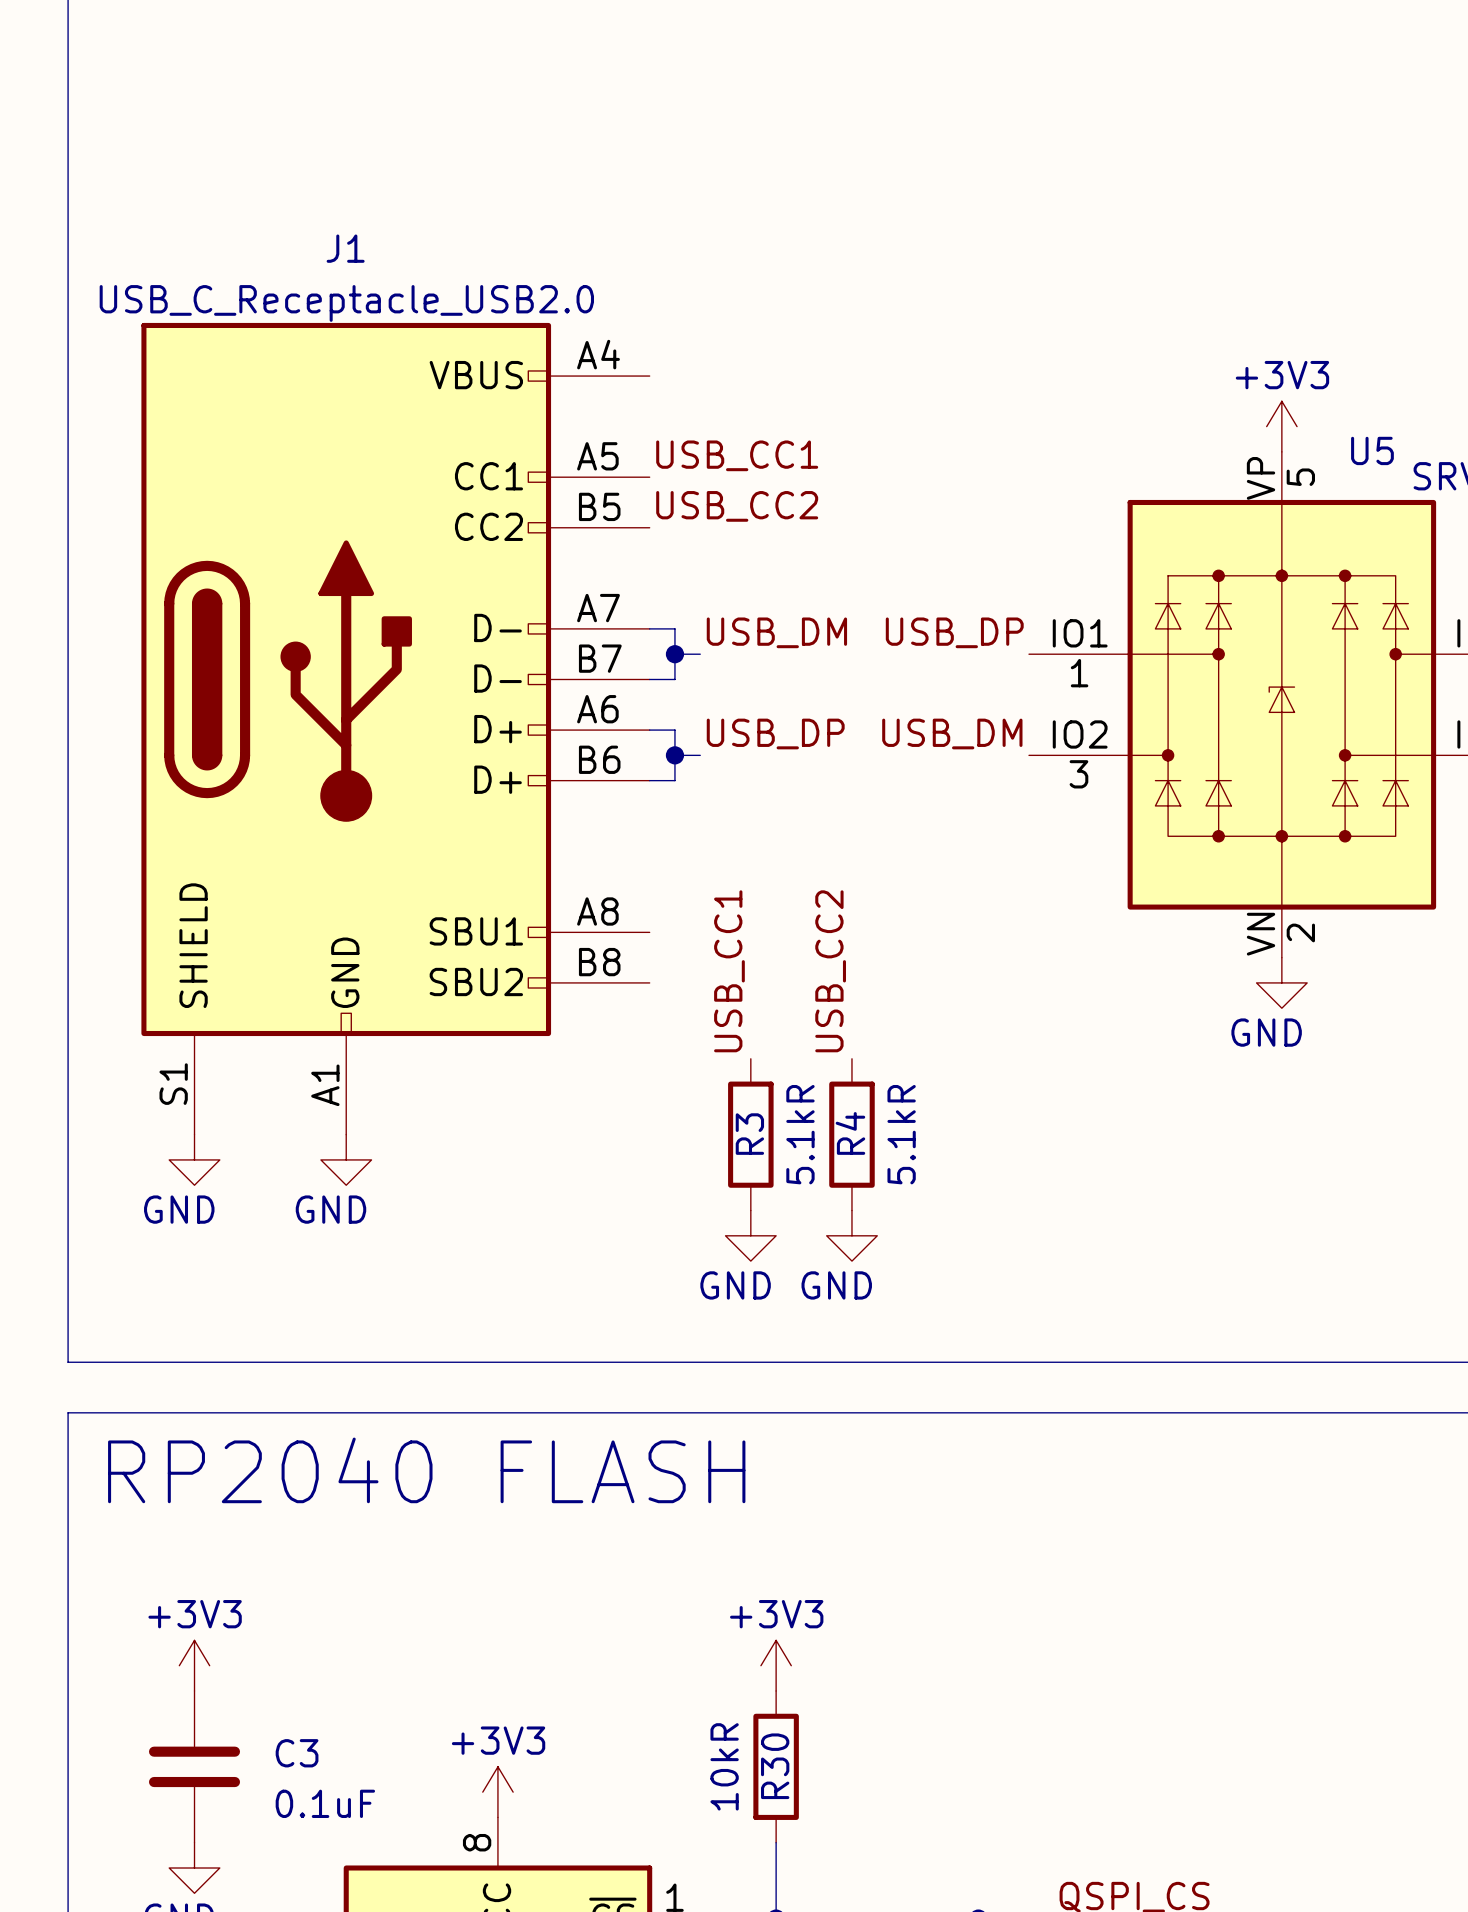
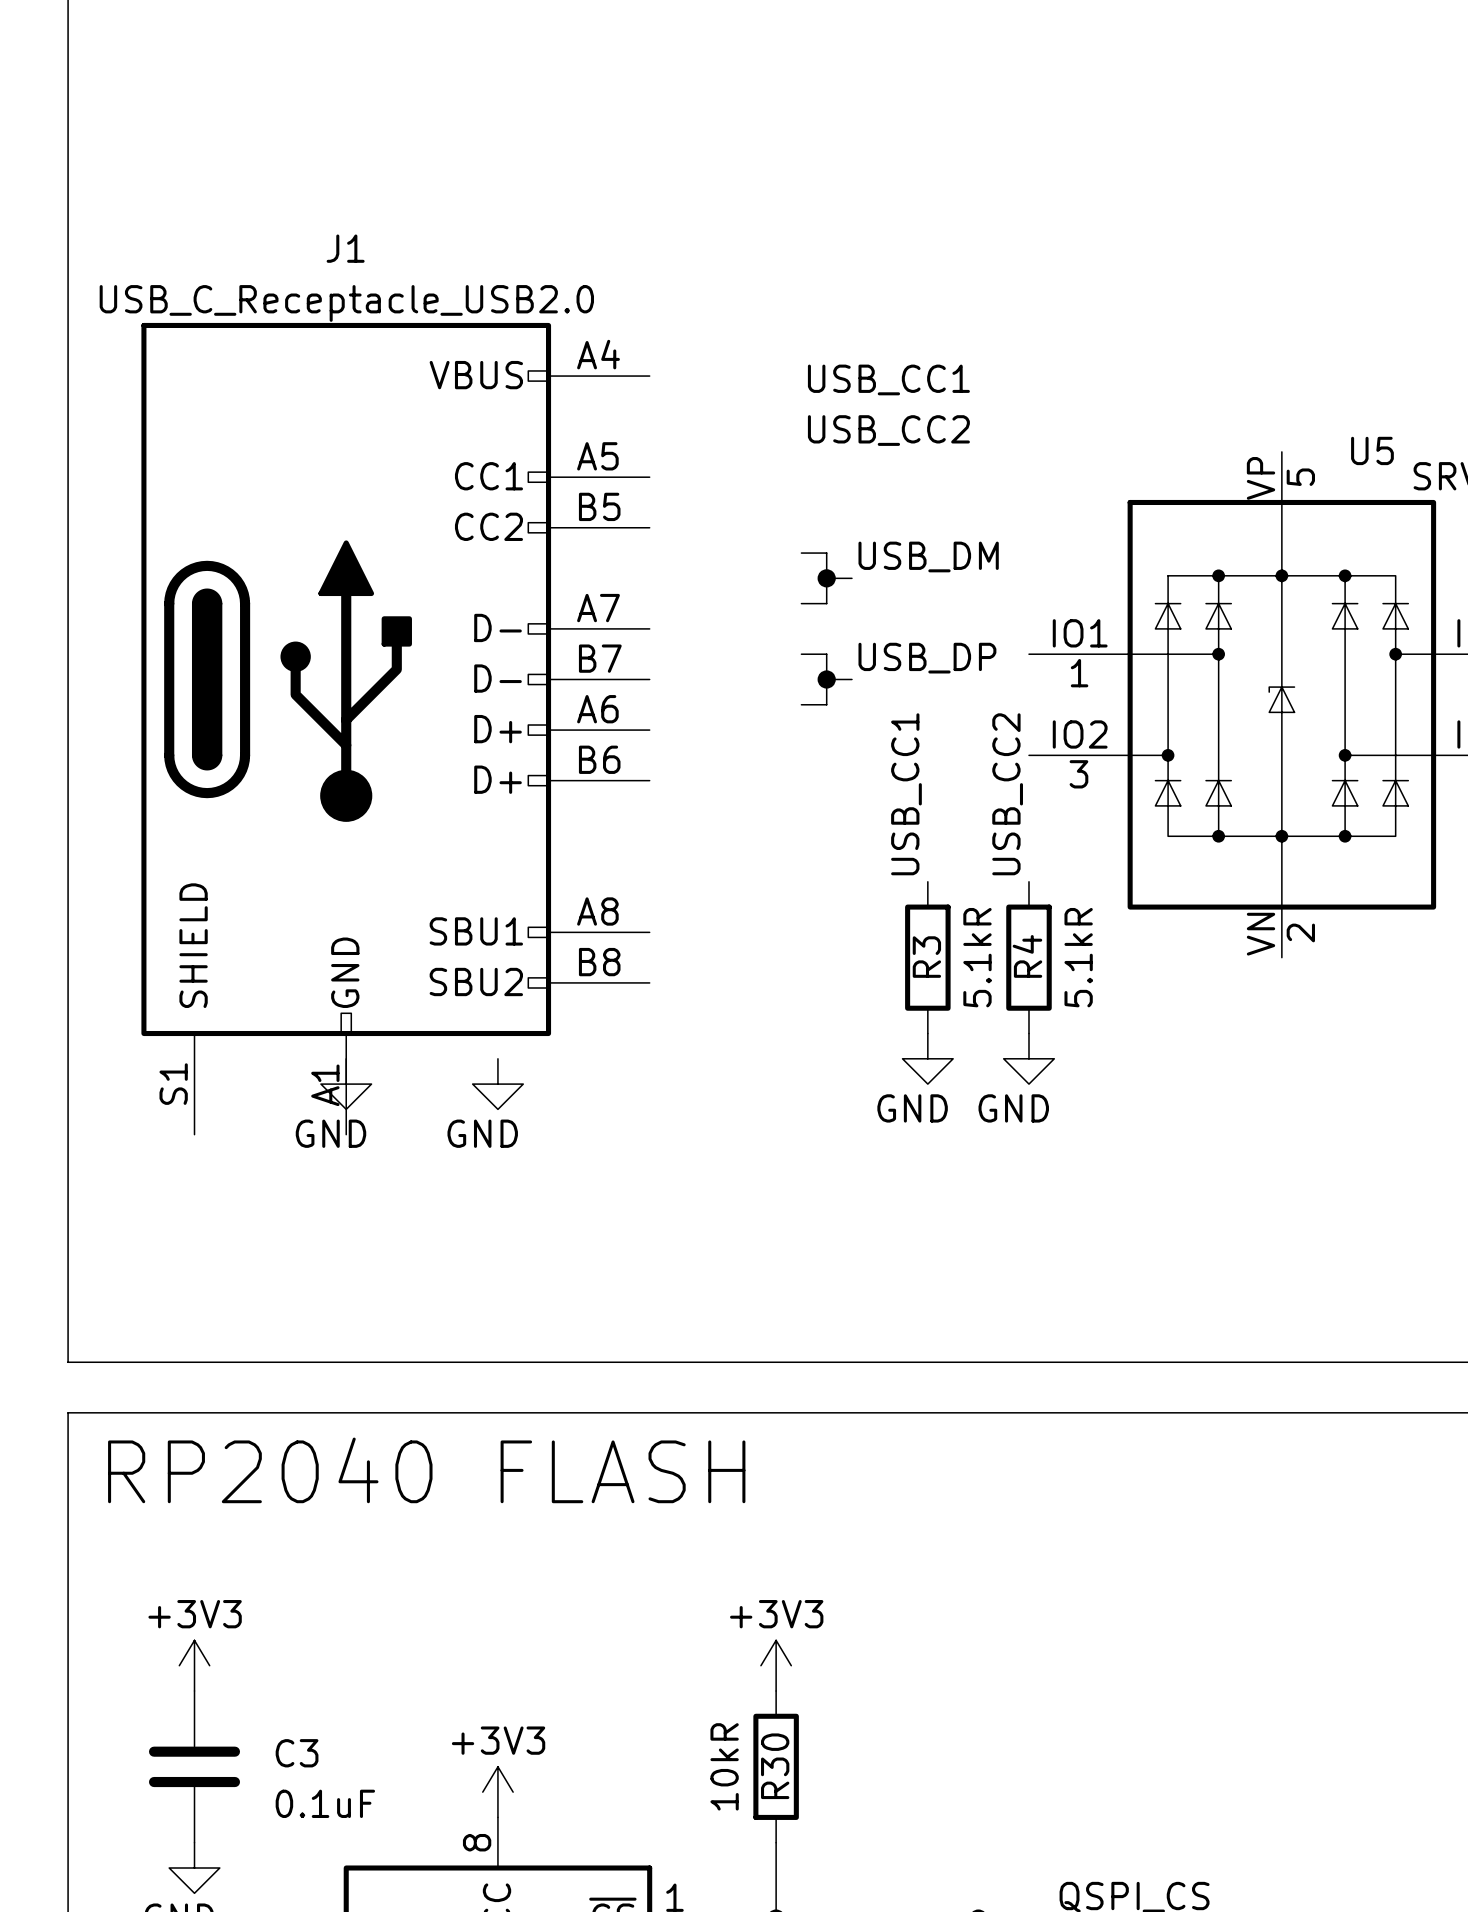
power symbol: +3V3 (1281, 426) -> none
label position: USB_CC1 (737, 455) -> USB_CC1 (888, 379)
label position: USB_CC2 (737, 506) -> USB_CC2 (888, 430)
label: none -> USB_DM (928, 556)
junction: none -> (826, 578)
wire: (649, 628) (674, 628) (674, 679) (649, 679) -> (801, 553) (826, 553) (826, 603) (801, 603)
label: USB_DM (776, 632) -> none
label: USB_DP (954, 632) -> none
wire: (674, 654) (700, 654) -> (826, 578) (851, 578)
junction: (674, 654) -> none
label: none -> USB_DP (927, 658)
junction: none -> (826, 679)
wire: (649, 730) (674, 730) (674, 780) (649, 780) -> (801, 654) (826, 654) (826, 704) (801, 704)
label: USB_DP (775, 733) -> none
label: USB_DM (952, 733) -> USB_CC1 (906, 794)
wire: (674, 755) (700, 755) -> (826, 679) (851, 679)
junction: (674, 755) -> none
label: USB_CC1 (729, 971) -> none
label position: USB_CC2 (830, 971) -> USB_CC2 (1007, 794)
power symbol: GND (1281, 982) -> none
power symbol: none -> GND (927, 1058)
power symbol: none -> GND (1028, 1058)
power symbol: none -> GND (497, 1084)
R3 position: (750, 1134) -> (927, 957)
R4 position: (851, 1134) -> (1028, 957)
power symbol: GND (194, 1159) -> none
power symbol position: GND (346, 1159) -> GND (346, 1084)
power symbol: GND (750, 1235) -> none
power symbol: GND (851, 1235) -> none

